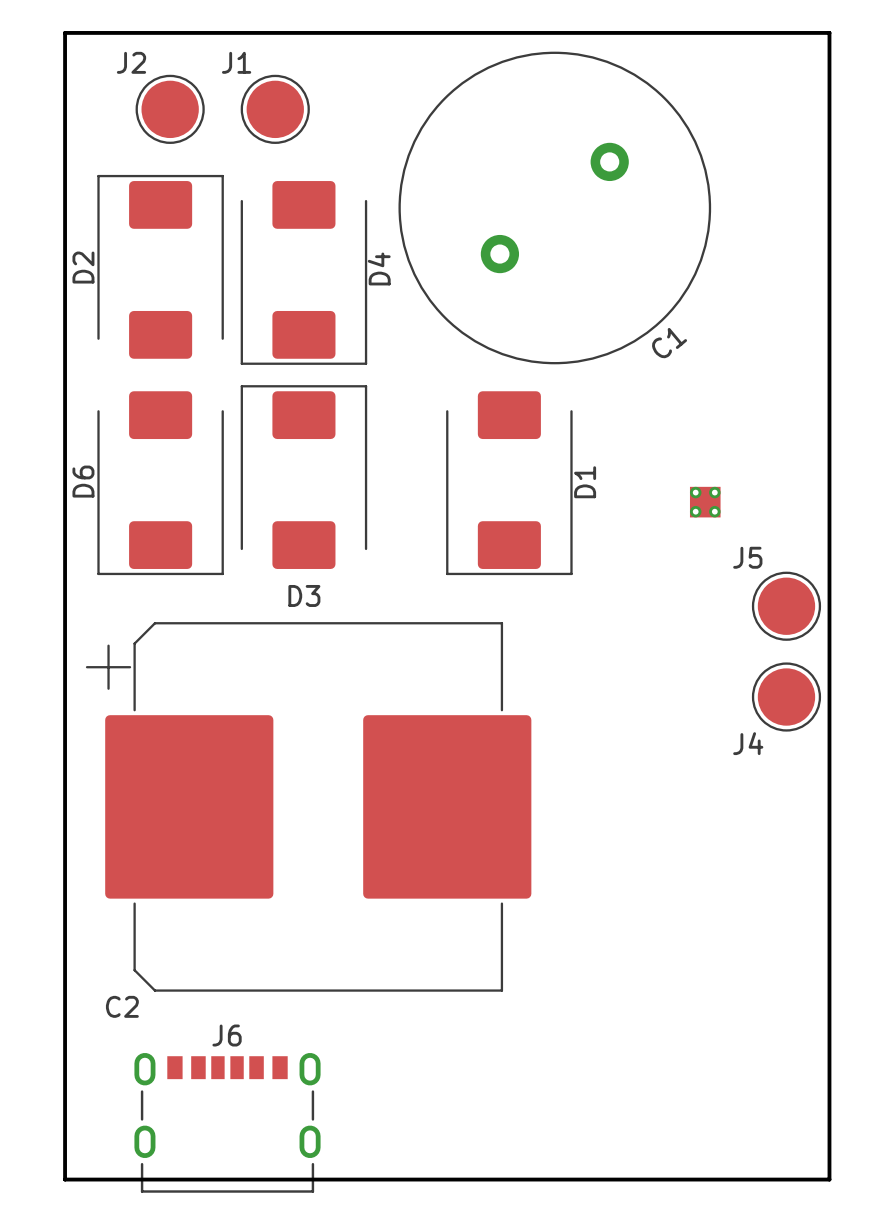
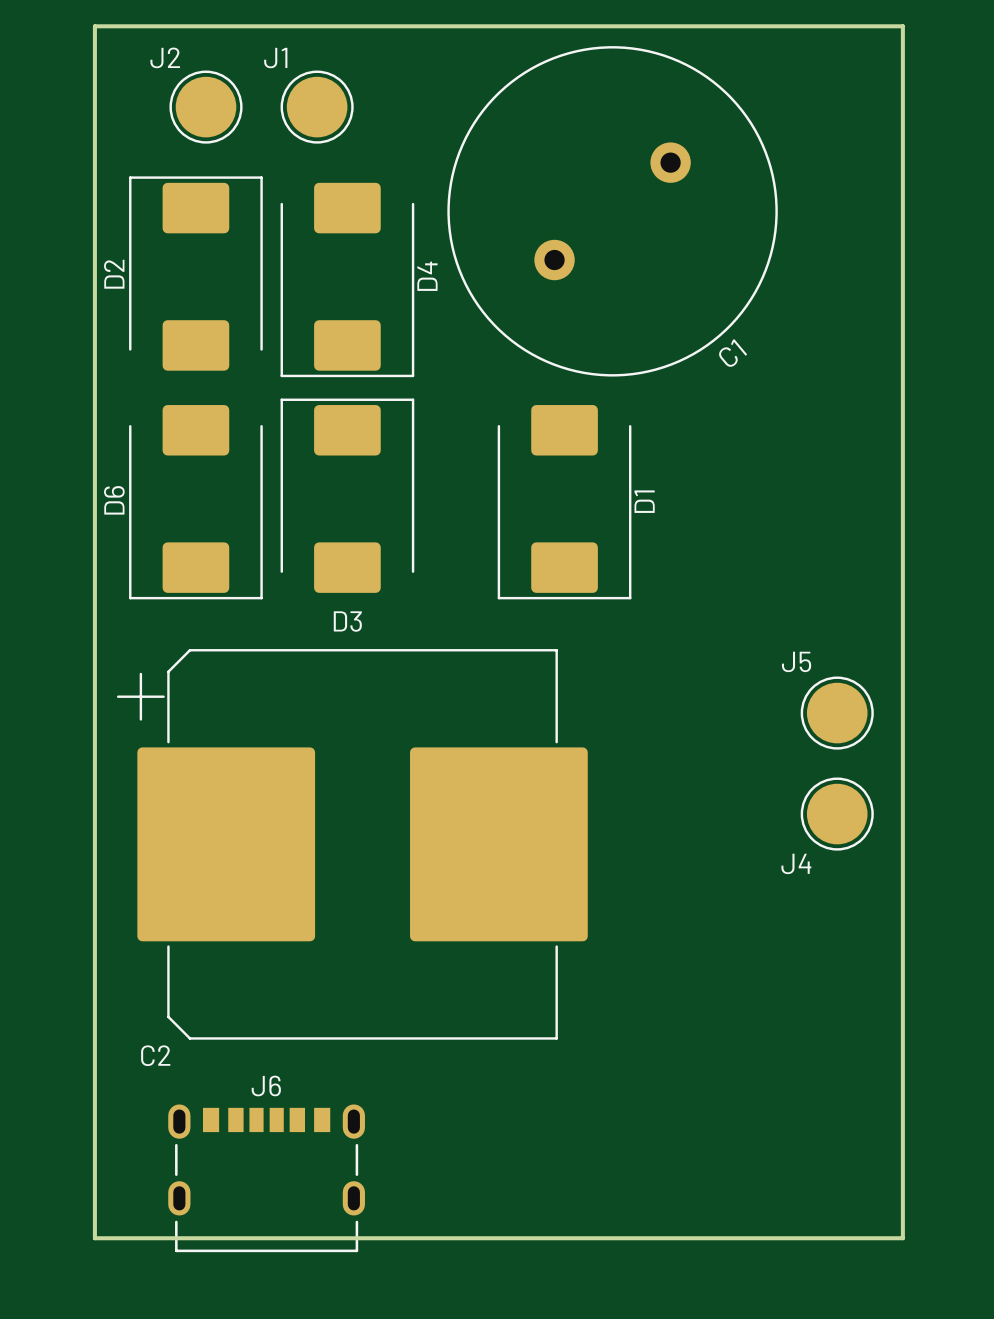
part: (705, 502) -> none
J5 position: (786, 606) -> (837, 713)
J4 position: (786, 697) -> (837, 814)

